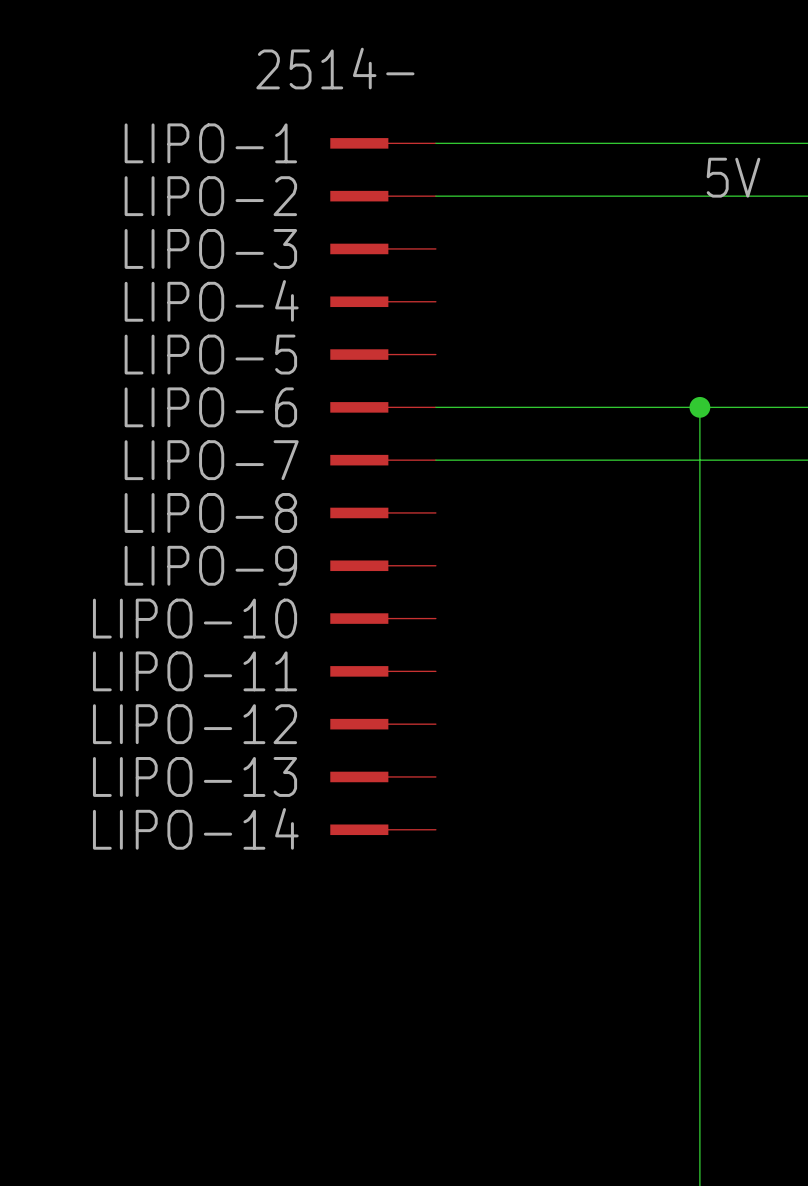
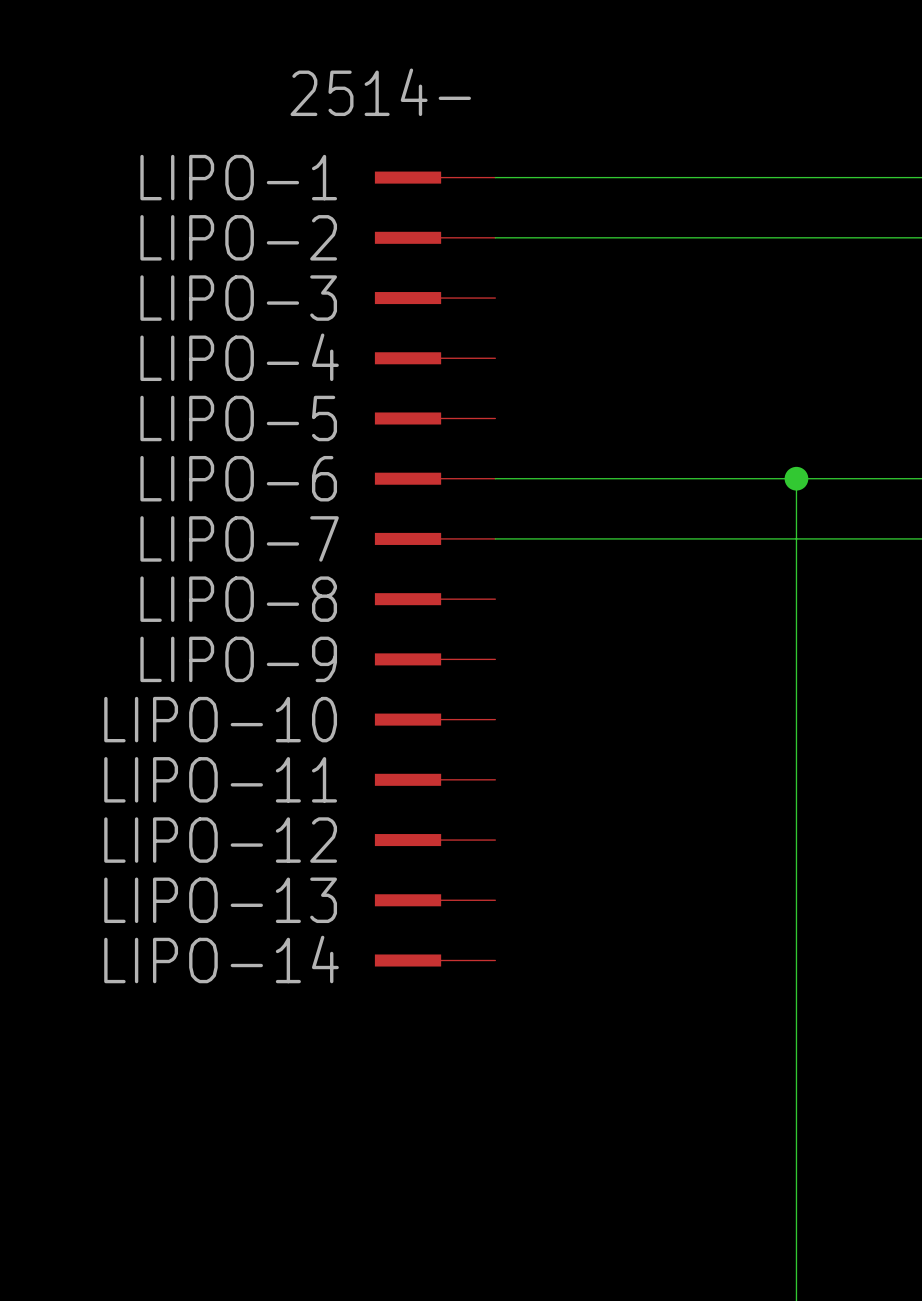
label: 5V (733, 177) -> none

